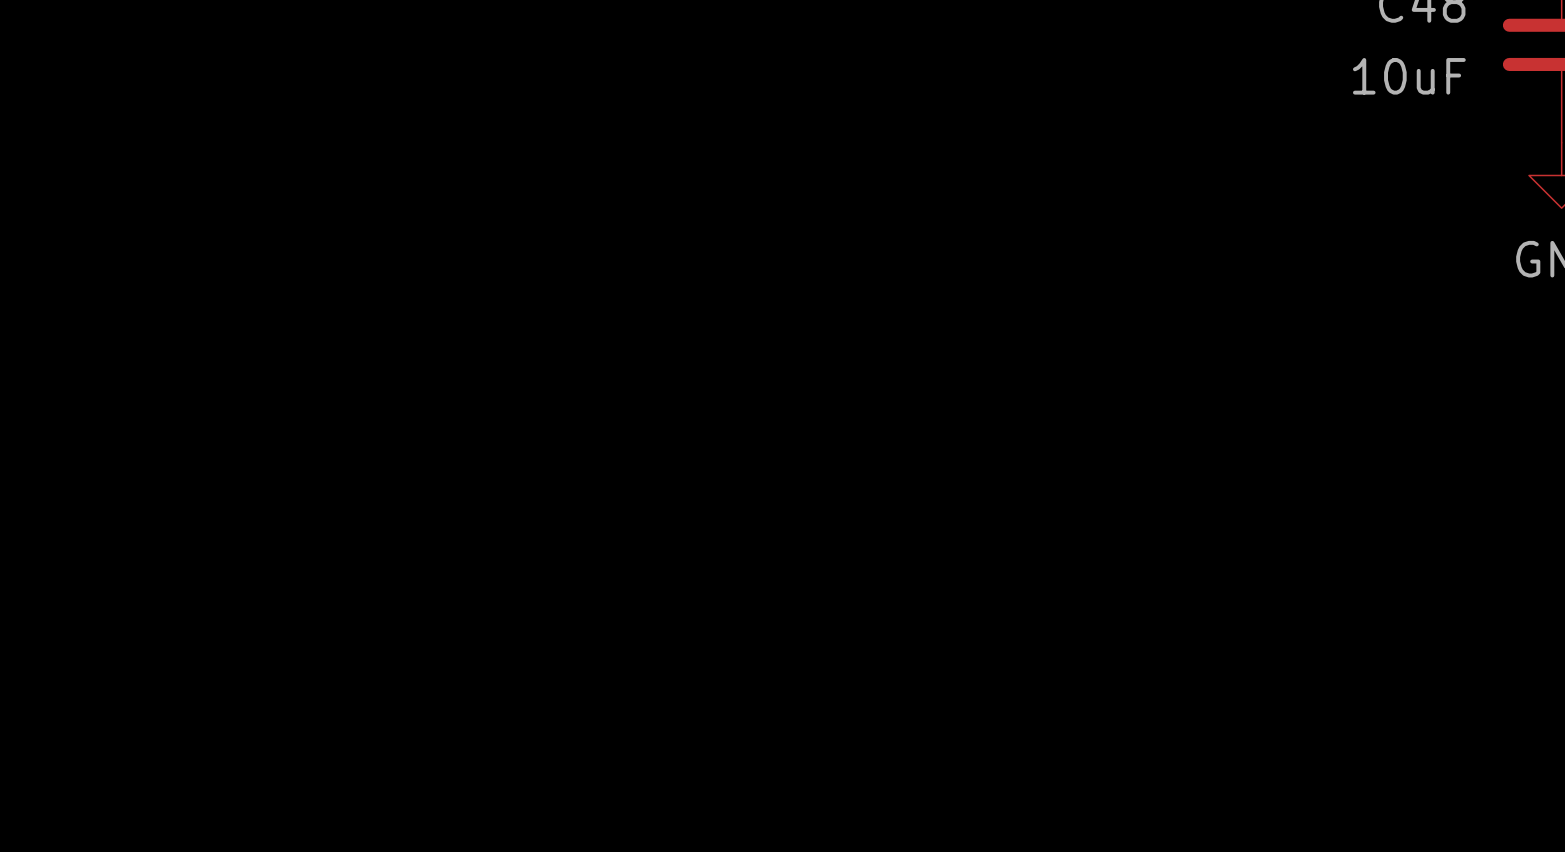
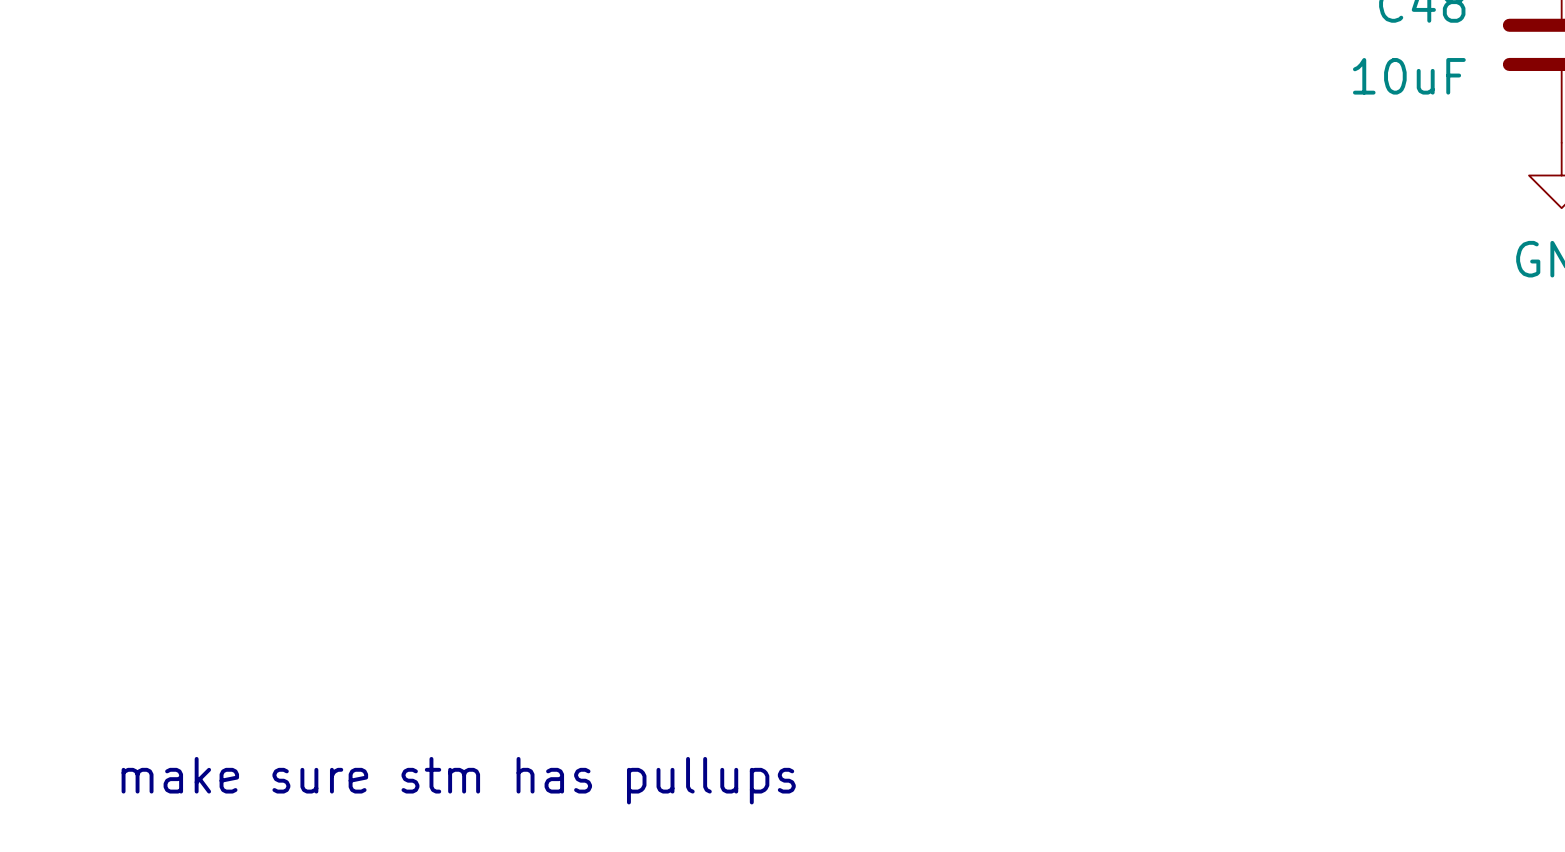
text: none -> make sure stm has pullups (458, 780)

